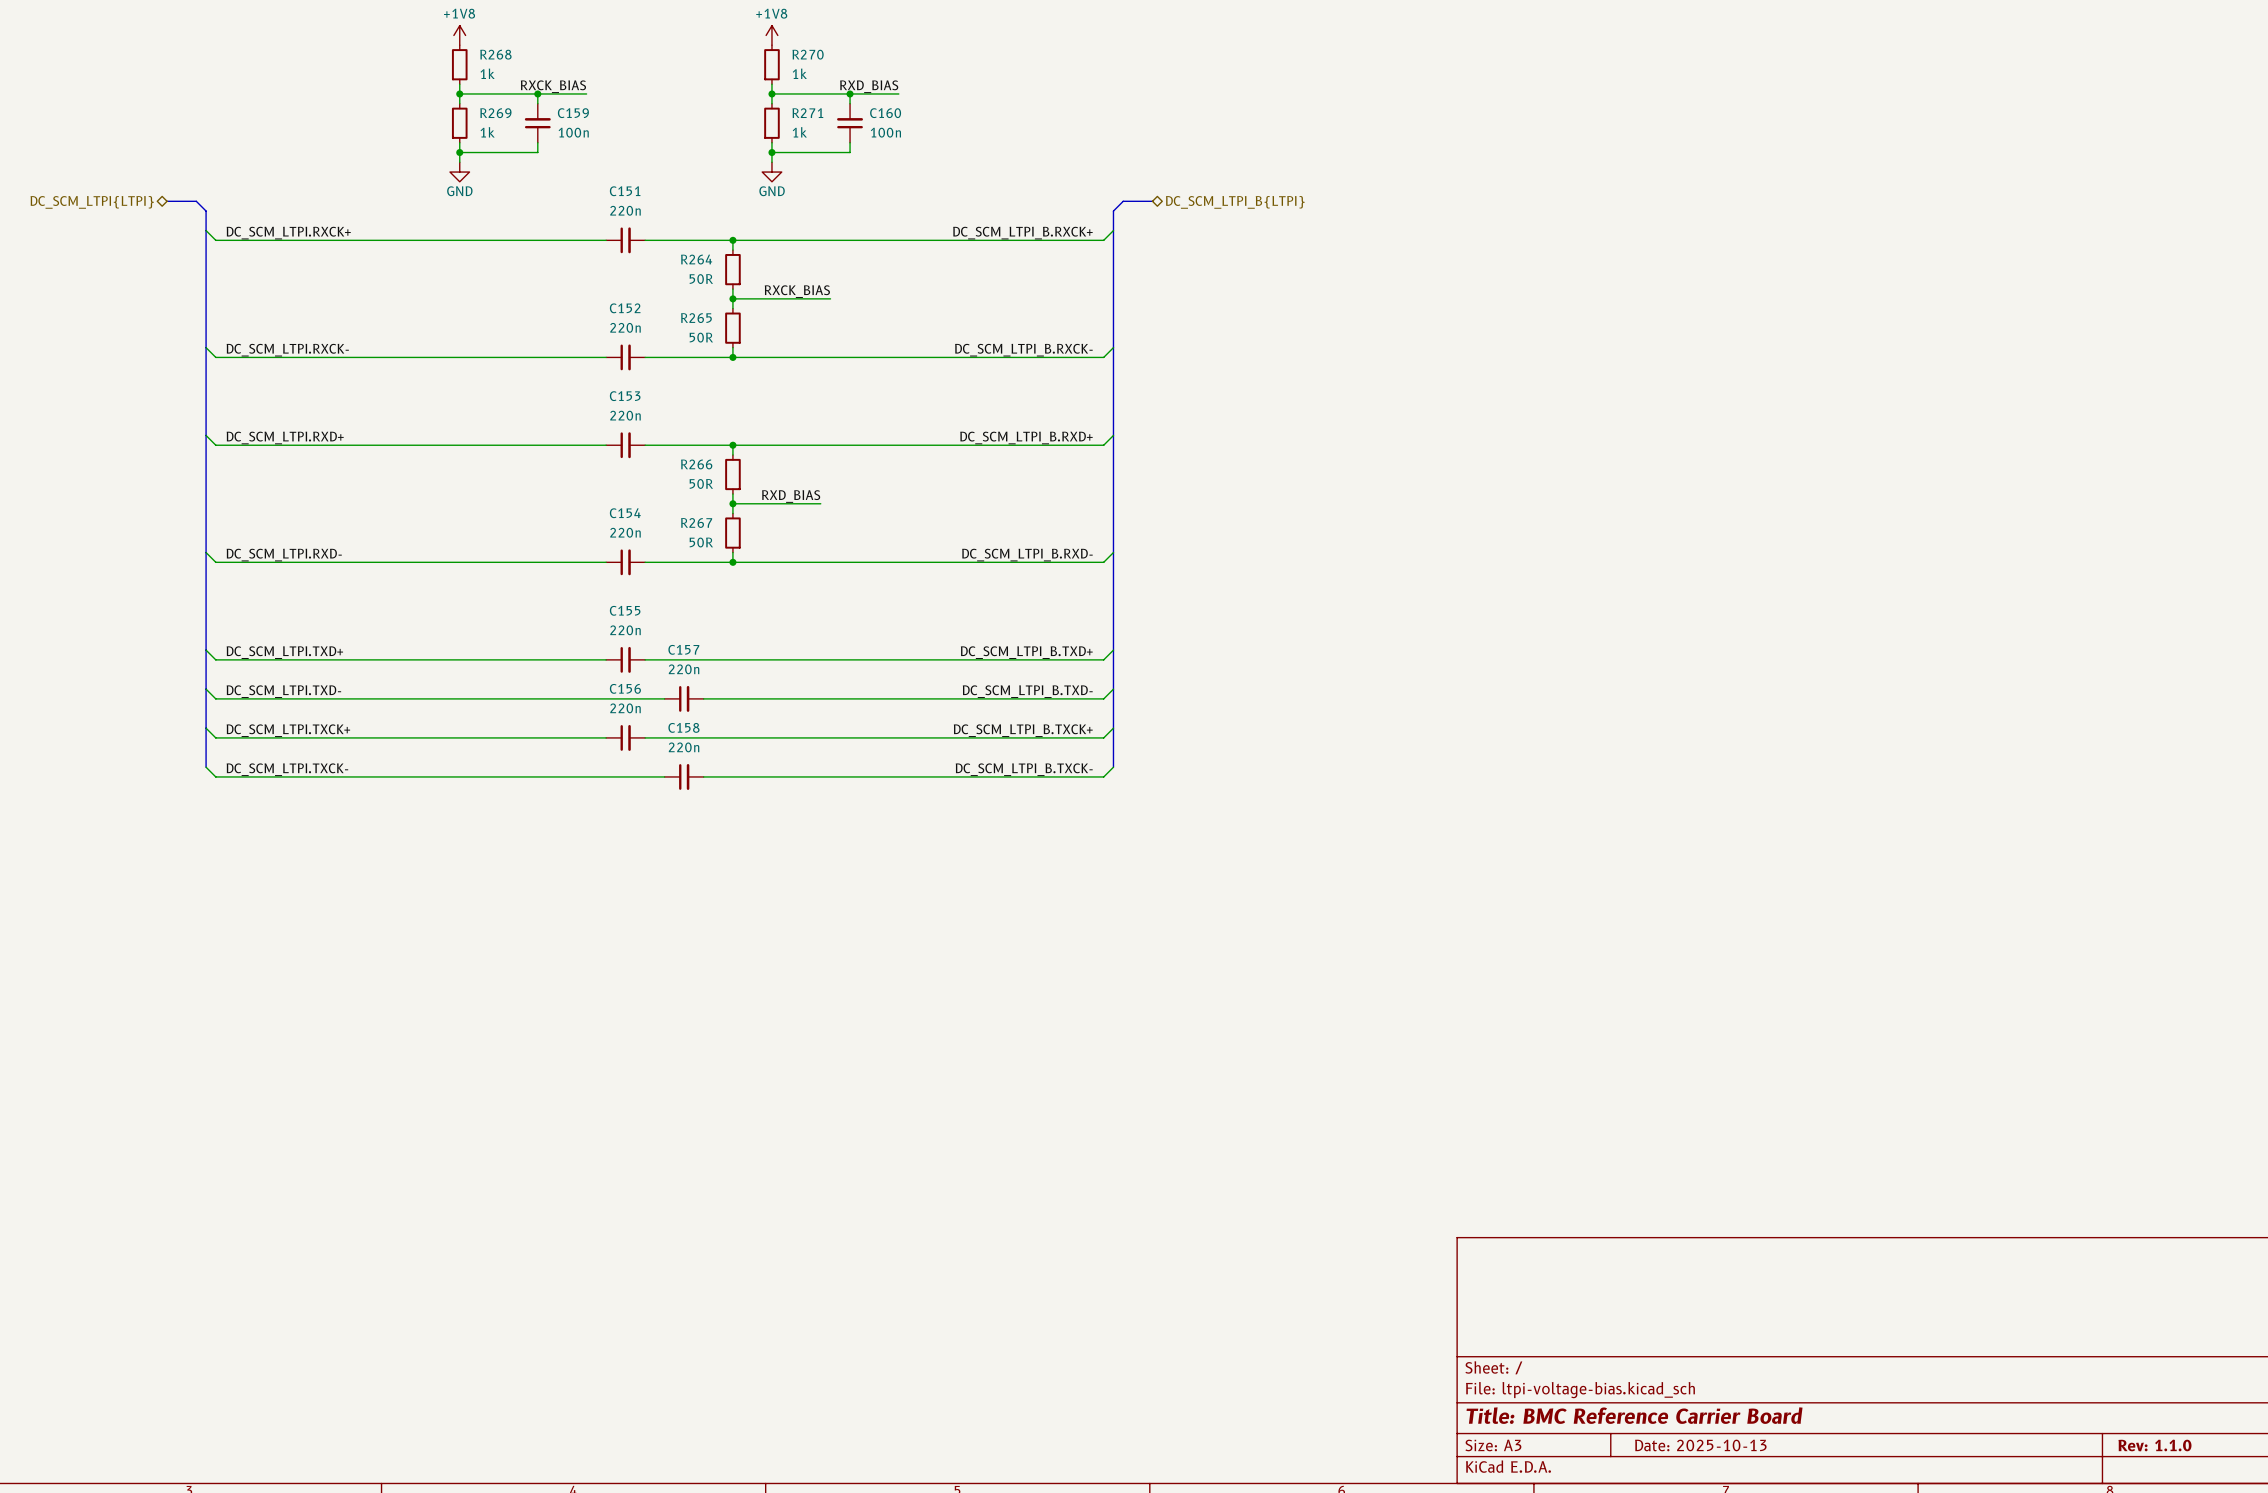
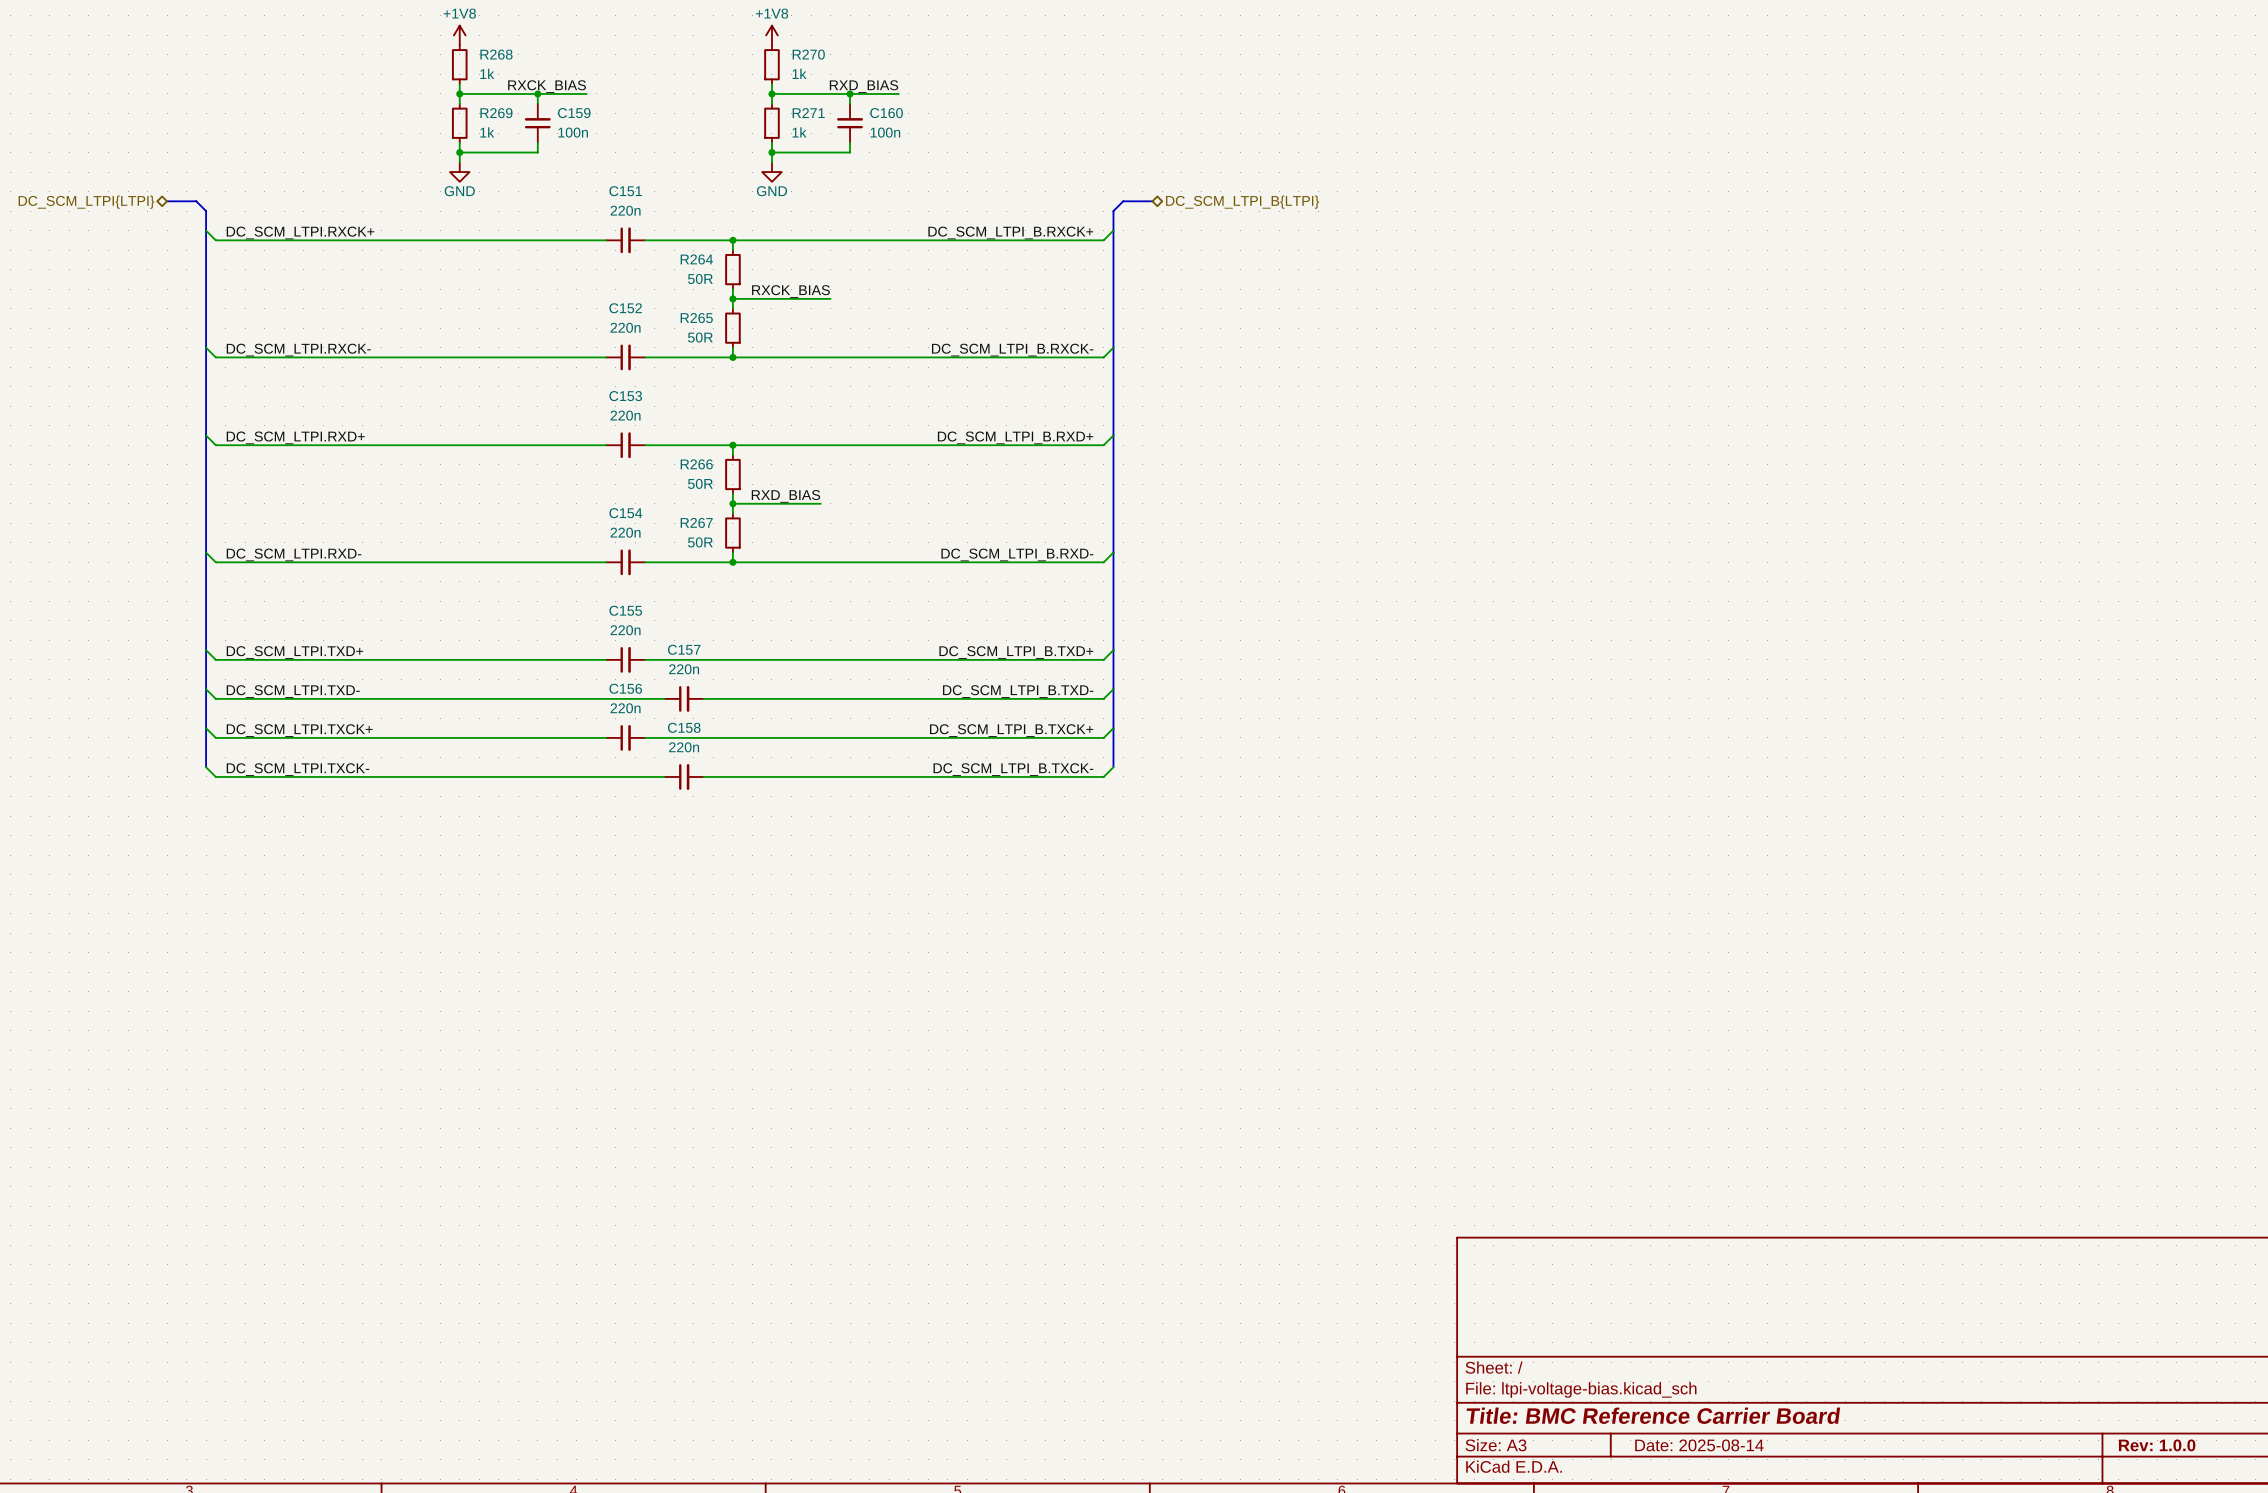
title block: Date: 2025-10-13 (1700, 1445) -> Date: 2025-08-14 (1699, 1445)
title block: Rev: 1.1.0 (2154, 1445) -> Rev: 1.0.0 (2157, 1445)

